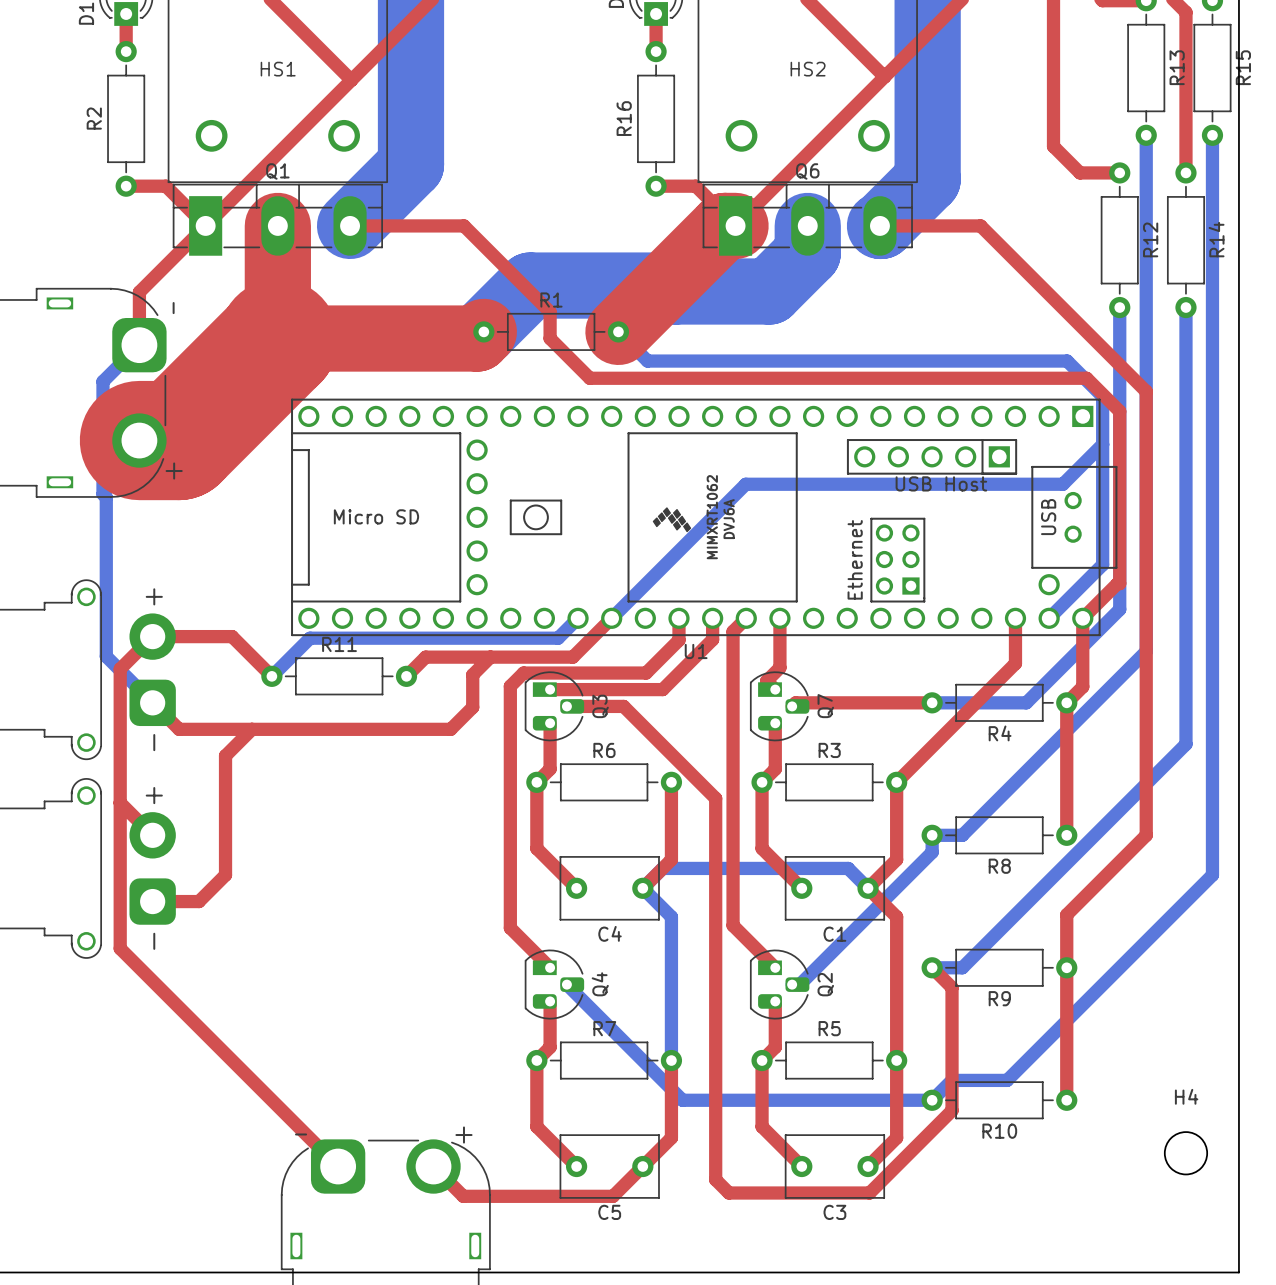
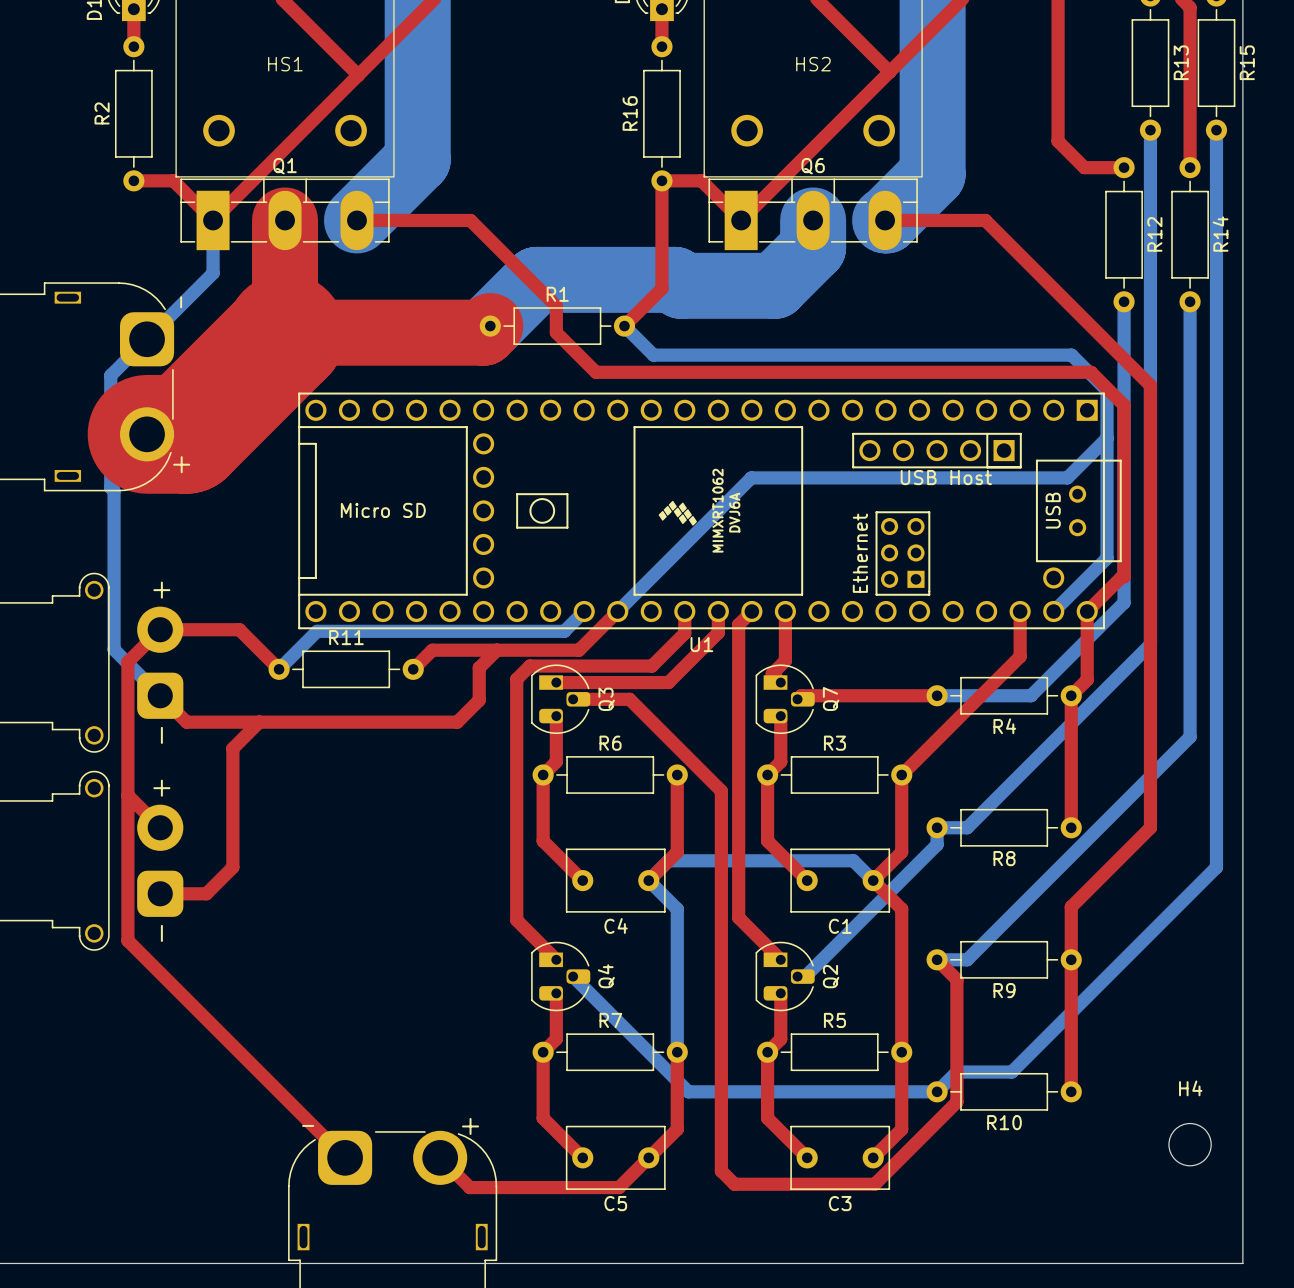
top track: (205, 225) (139, 292) (139, 345) -> none
bottom track: none -> (213, 220) (213, 273) (147, 339)
top track: (735, 225) (724, 225) (656, 294) -> (661, 180) (661, 288)
top track width: thick (656, 294) (618, 331) -> thin (661, 288) (624, 326)

